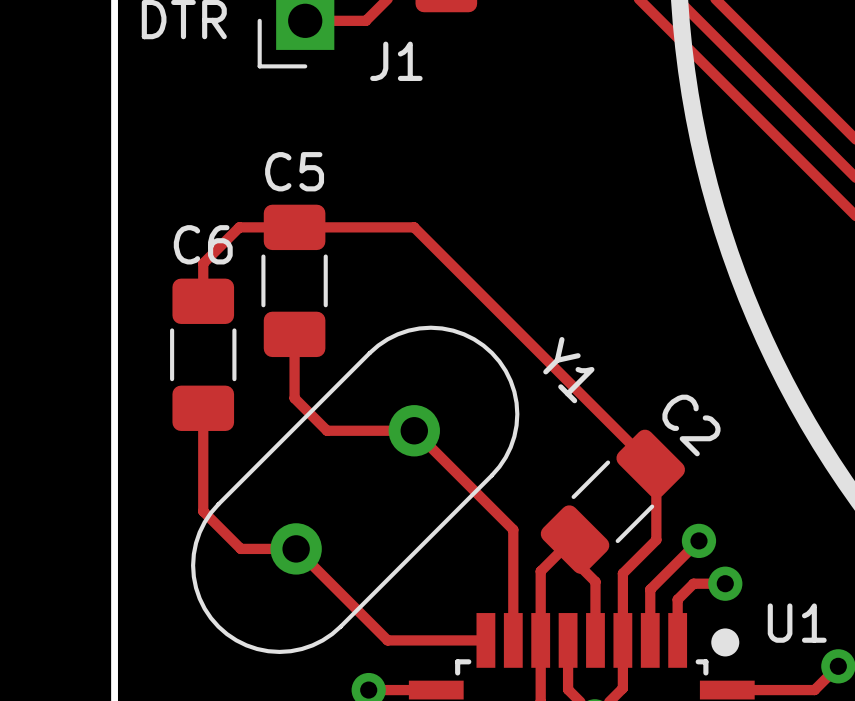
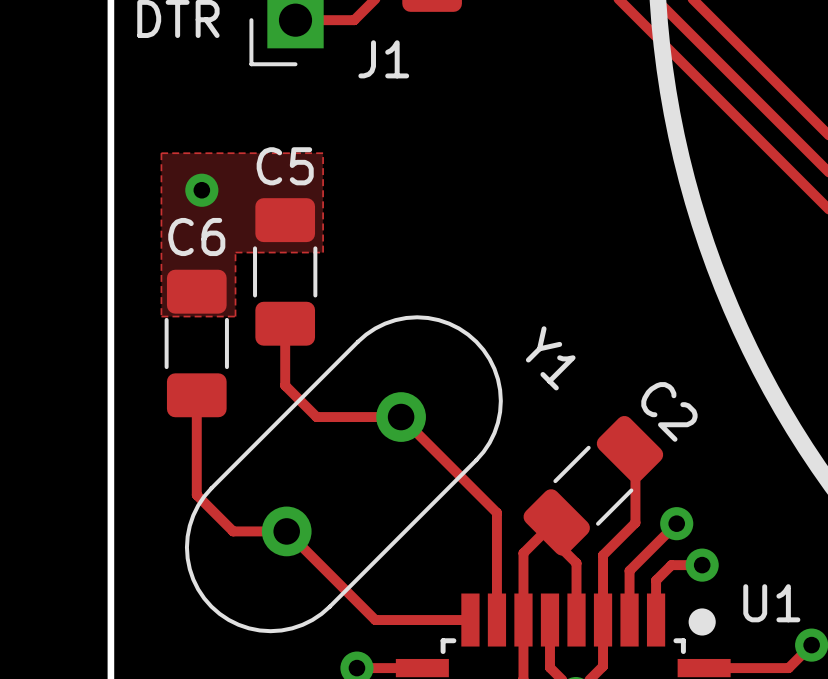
zone outline: none -> (161, 153) (323, 153) (323, 252) (235, 252) (235, 316) (161, 316) (161, 153)
via: none -> (201, 190)
track: (203, 301) (203, 263) (239, 227) (414, 227) (650, 463) -> none

